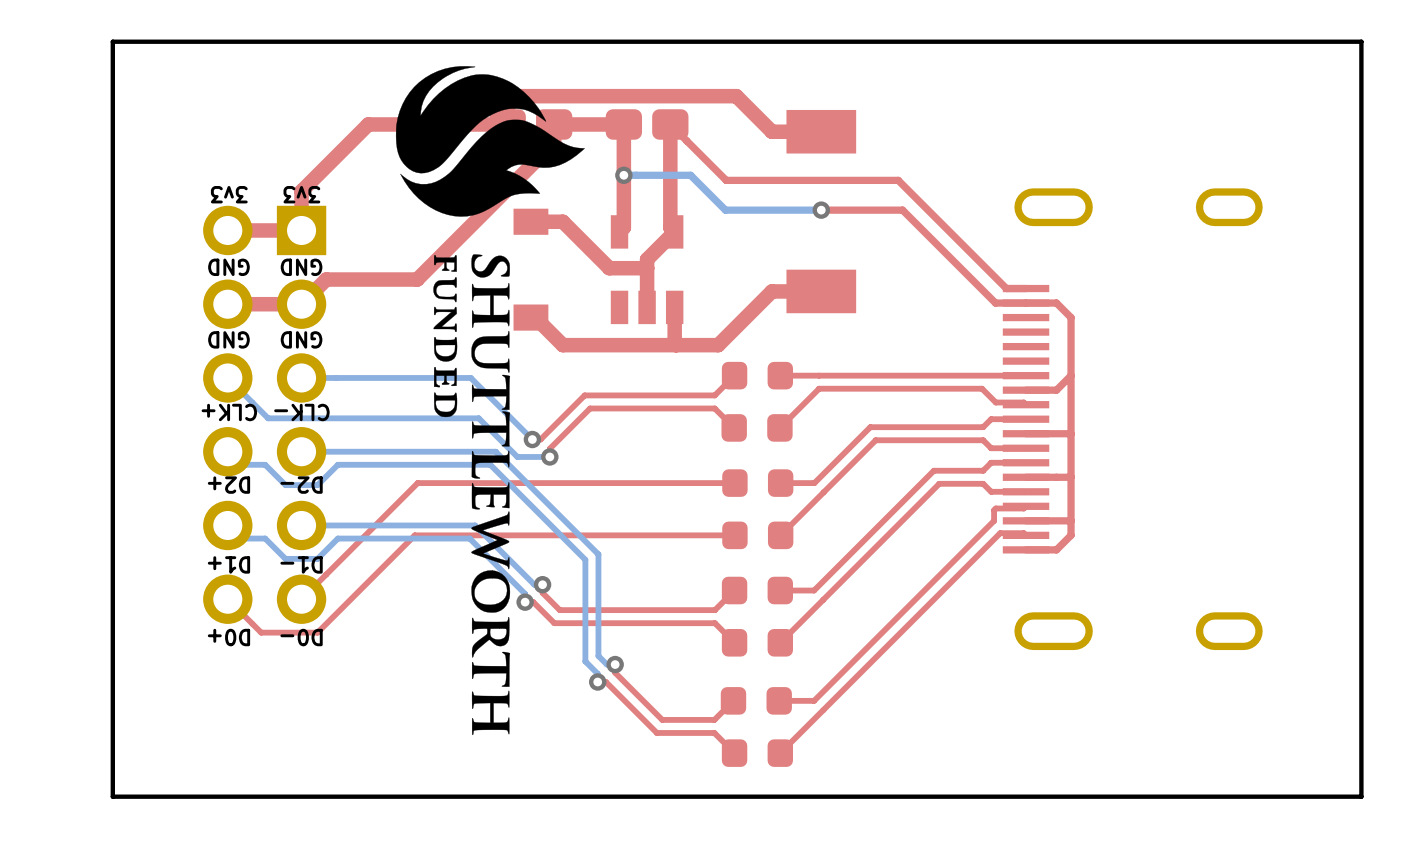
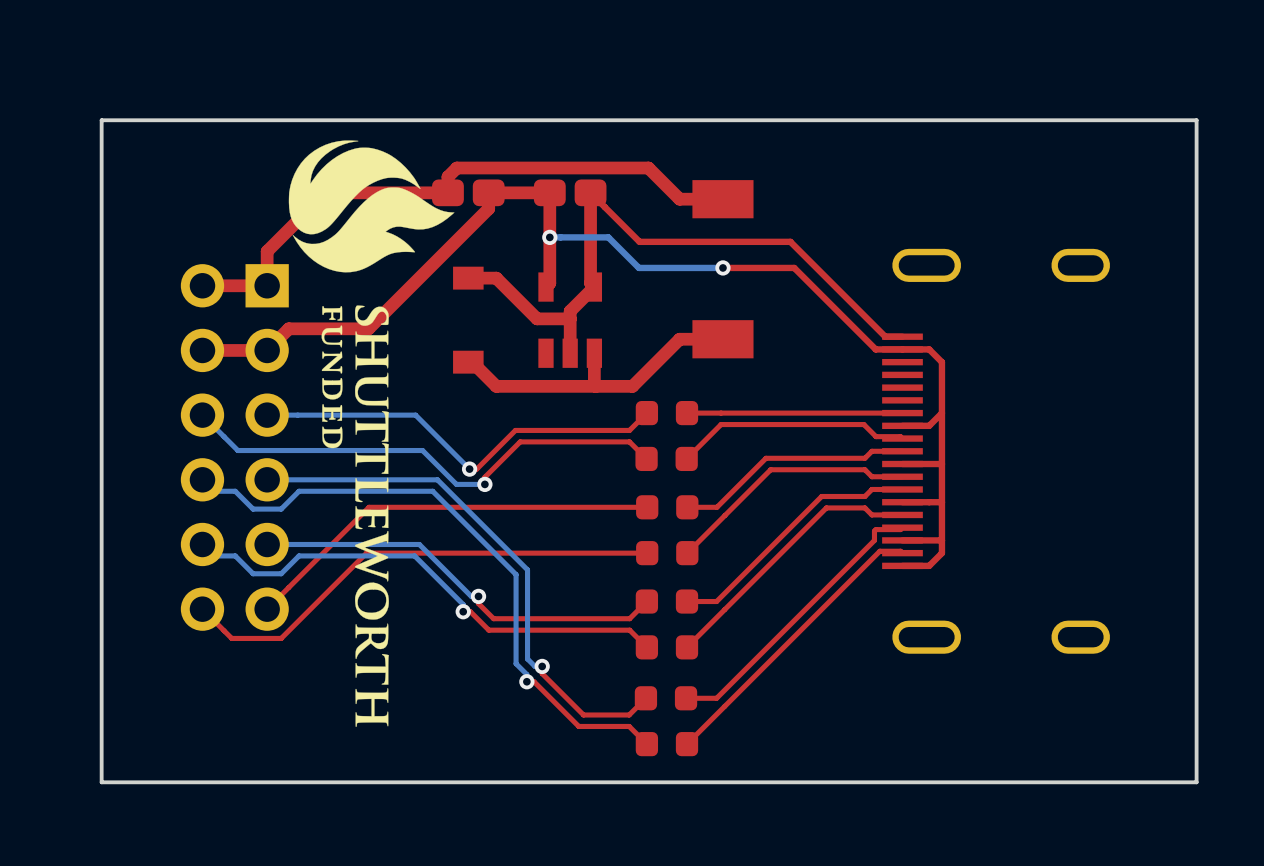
text: 3v3 (229, 194) -> none
text: 3v3 (301, 194) -> none
text: GND (228, 267) -> none
text: GND (301, 267) -> none
text: GND (228, 339) -> none
text: GND (301, 339) -> none
drawing position: (490, 400) -> (371, 433)
text: CLK+ (229, 412) -> none
text: CLK- (301, 412) -> none
text: D2+ (228, 485) -> none
text: D2- (301, 485) -> none
text: D1+ (228, 564) -> none
text: D1- (301, 564) -> none
text: D0+ (228, 637) -> none
text: D0- (301, 637) -> none

